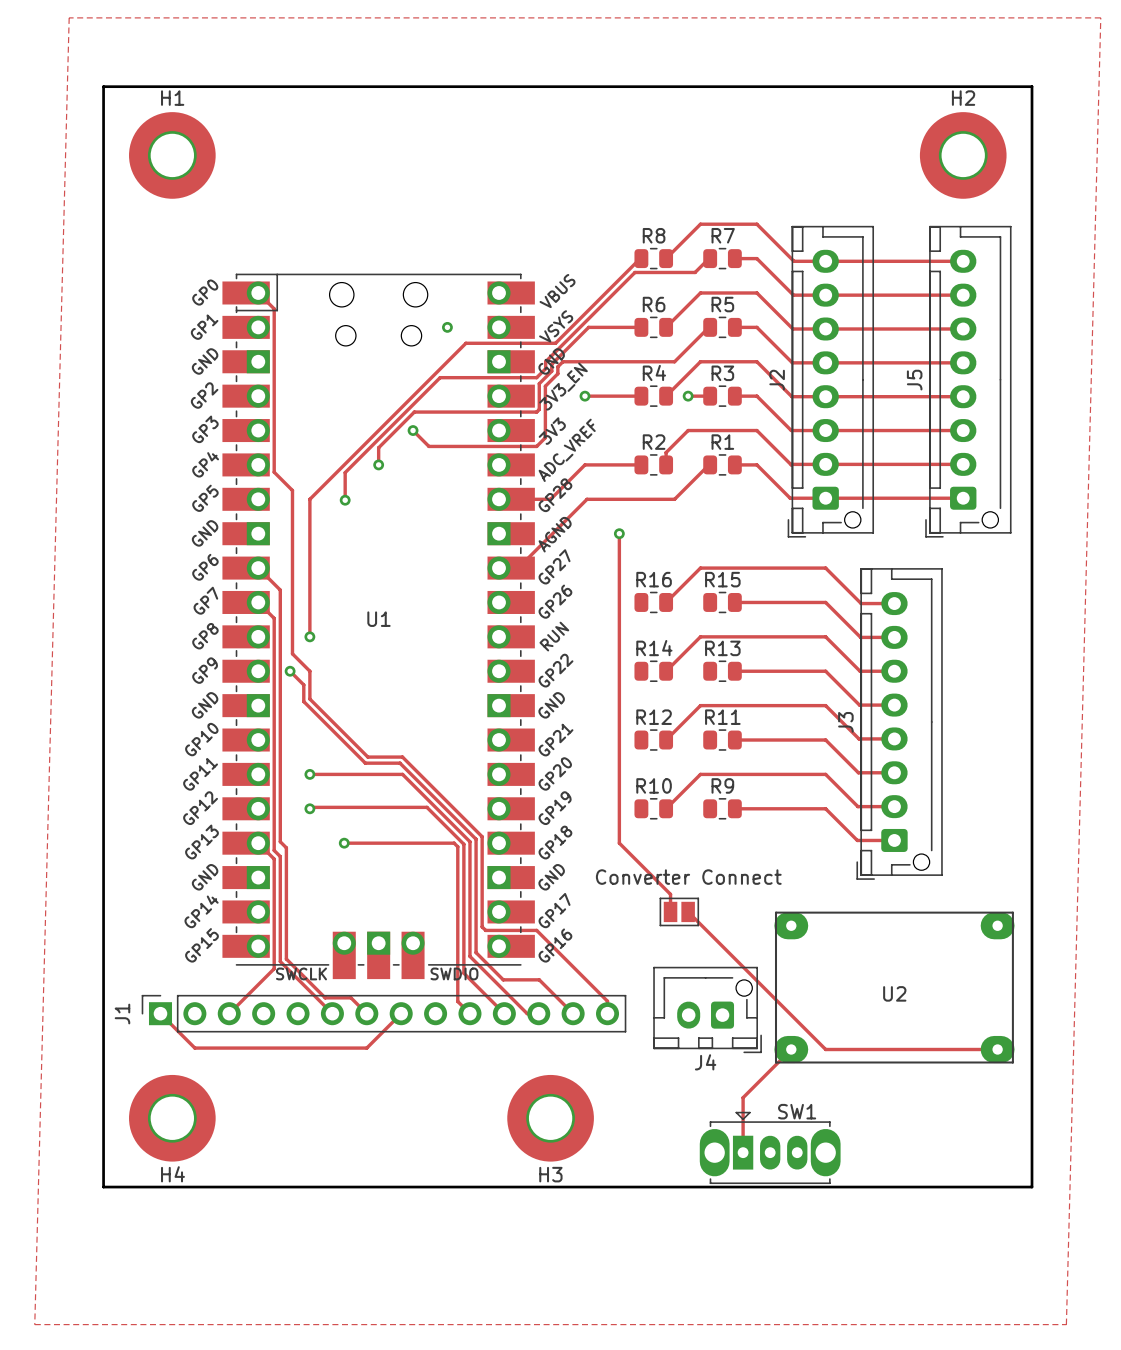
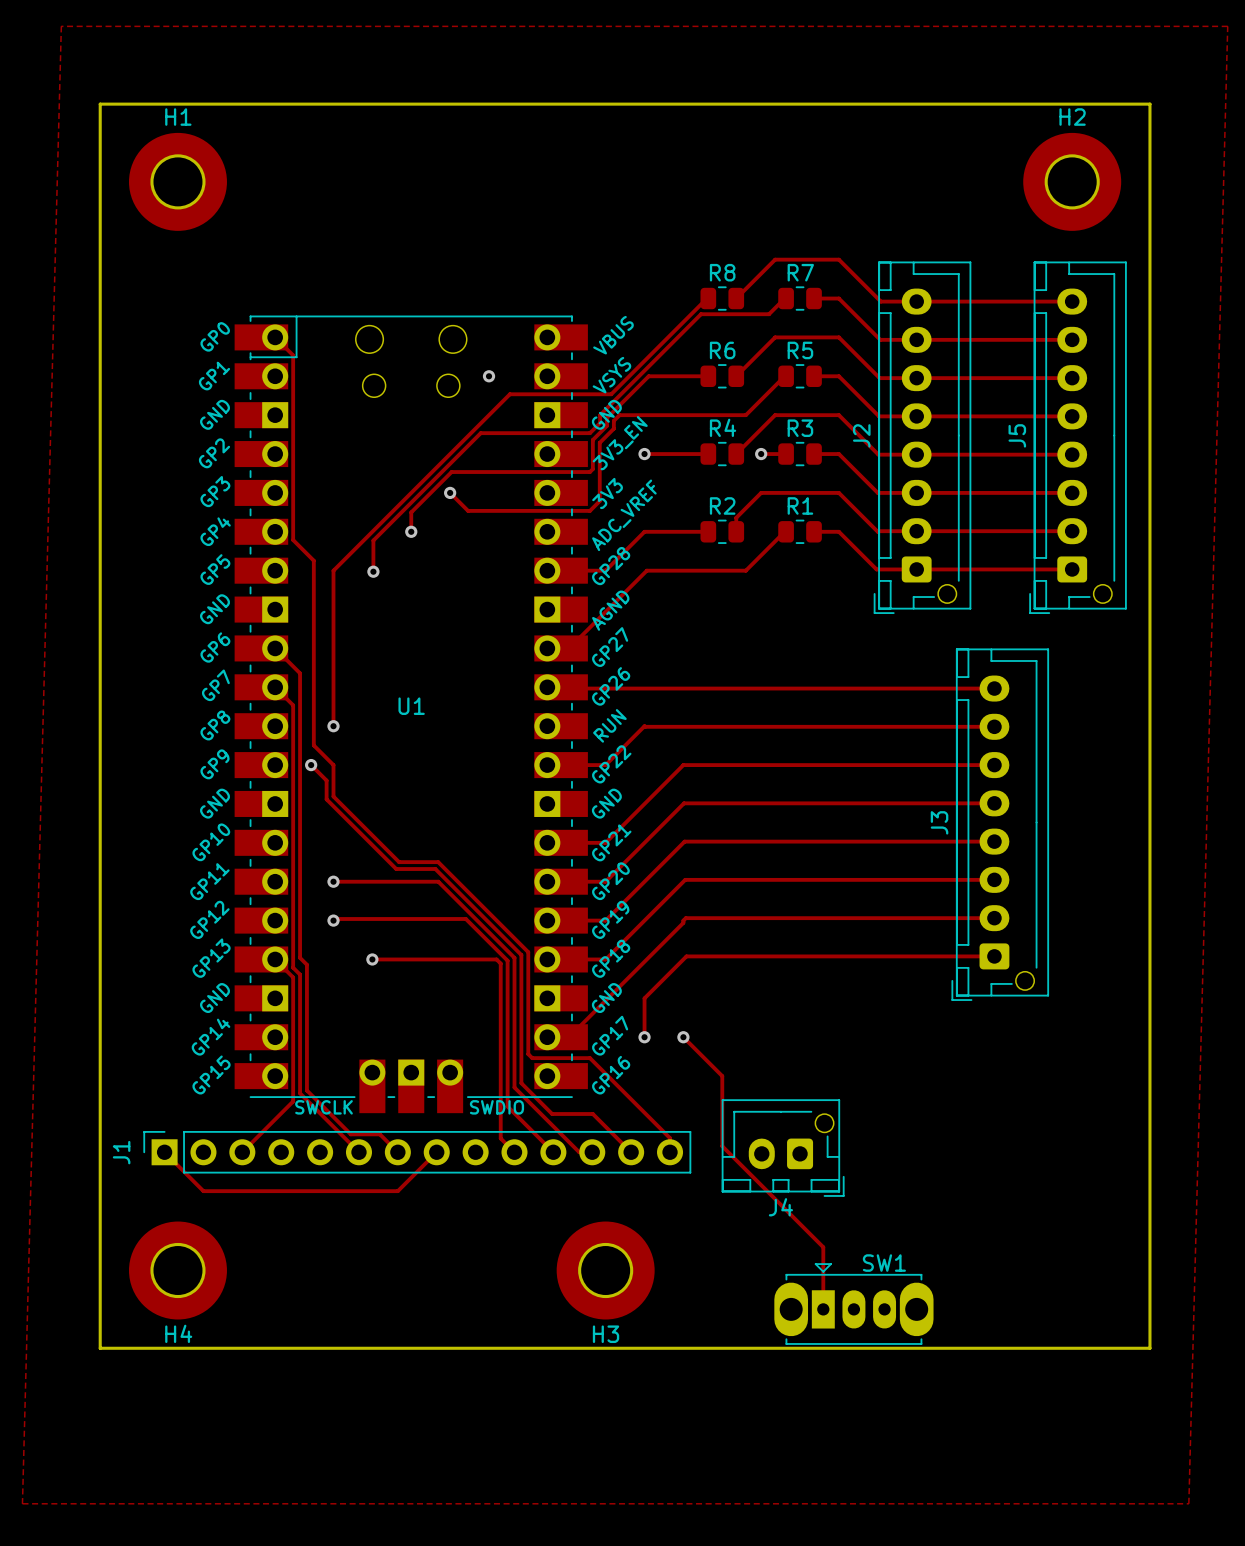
track: (619, 533) (619, 808) -> none
via: (619, 533) -> none
R16: (653, 602) -> none
track: (666, 602) (700, 568) (825, 568) (861, 603) -> (547, 687) (956, 688)
R15: (722, 602) -> none
track: (734, 602) (825, 602) (860, 637) -> (547, 765) (605, 765) (644, 726) (956, 726)
R14: (653, 671) -> none
track: (666, 671) (700, 636) (825, 636) (860, 671) -> none
R13: (722, 671) -> none
track: none -> (814, 765) (683, 765) (605, 842) (547, 842)
track: (825, 671) (859, 705) -> (916, 765) (955, 765)
track: none -> (954, 803) (684, 803) (605, 881) (547, 881)
track: (858, 738) (825, 705) (700, 705) (666, 740) -> (954, 841) (684, 841) (605, 920) (547, 920)
R12: (653, 740) -> none
R11: (722, 740) -> none
track: (734, 740) (825, 740) (858, 772) -> (547, 959) (605, 959) (685, 879) (953, 879)
track: (857, 806) (825, 774) (700, 774) (666, 808) -> (953, 918) (685, 918) (683, 920)
R10: (653, 808) -> none
R9: (722, 808) -> none
track: (734, 808) (825, 808) (857, 840) -> (644, 1037) (644, 998) (686, 956) (952, 956)
track: (619, 810) (619, 843) (670, 894) (670, 911) -> (683, 922) (569, 1037) (547, 1037)
via: none -> (644, 1037)
via: none -> (683, 1037)
part: (679, 911) -> none
track: (688, 911) (825, 1049) (997, 1049) -> none
U2: (894, 987) -> none
track: (791, 1049) (743, 1097) -> (683, 1037) (722, 1076) (722, 1146) (823, 1247)

